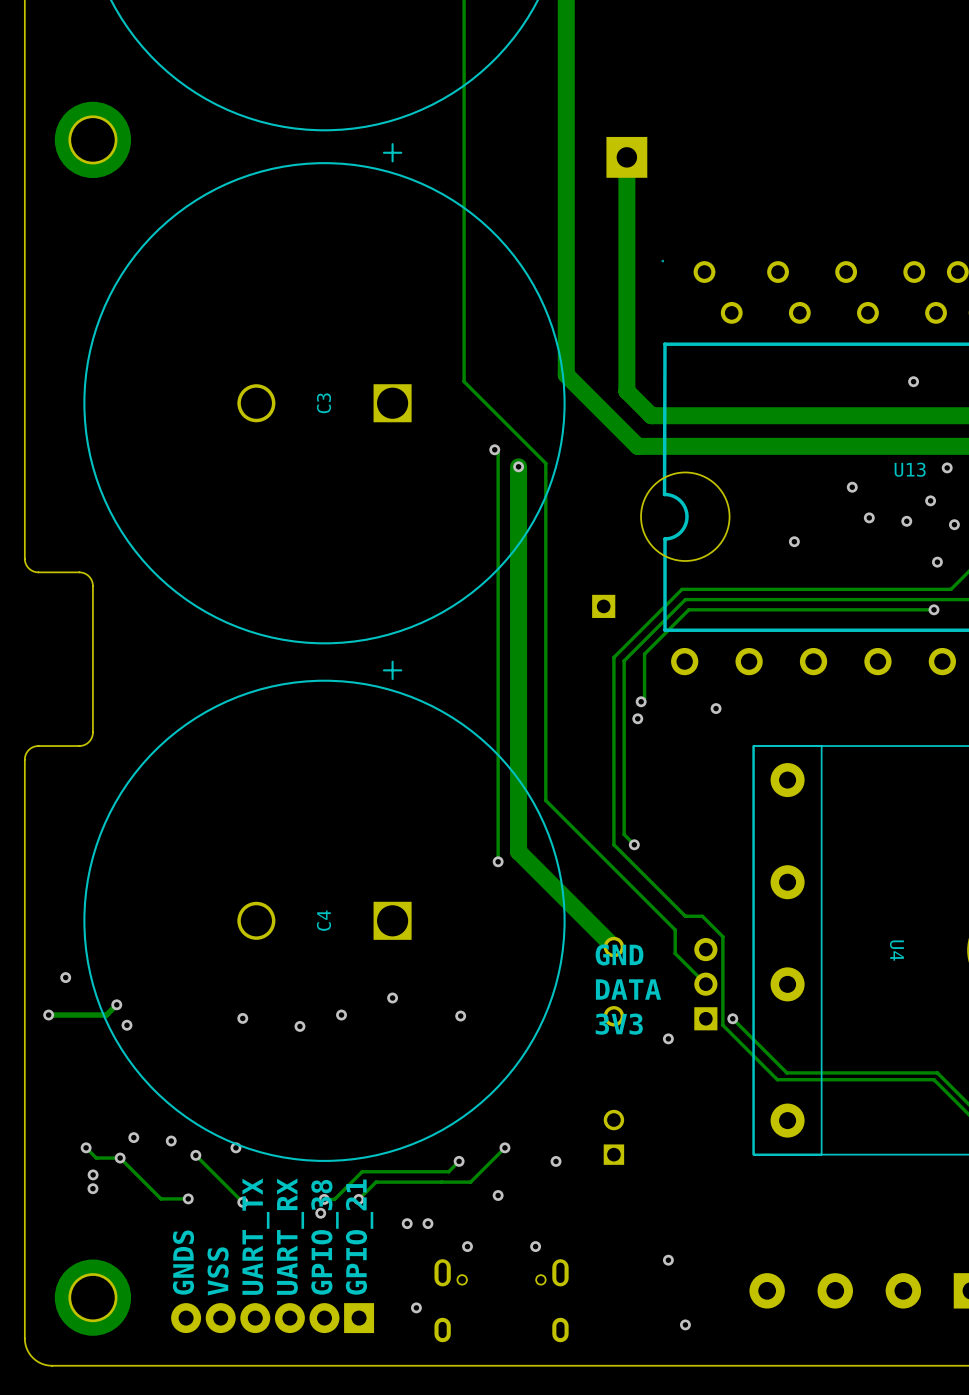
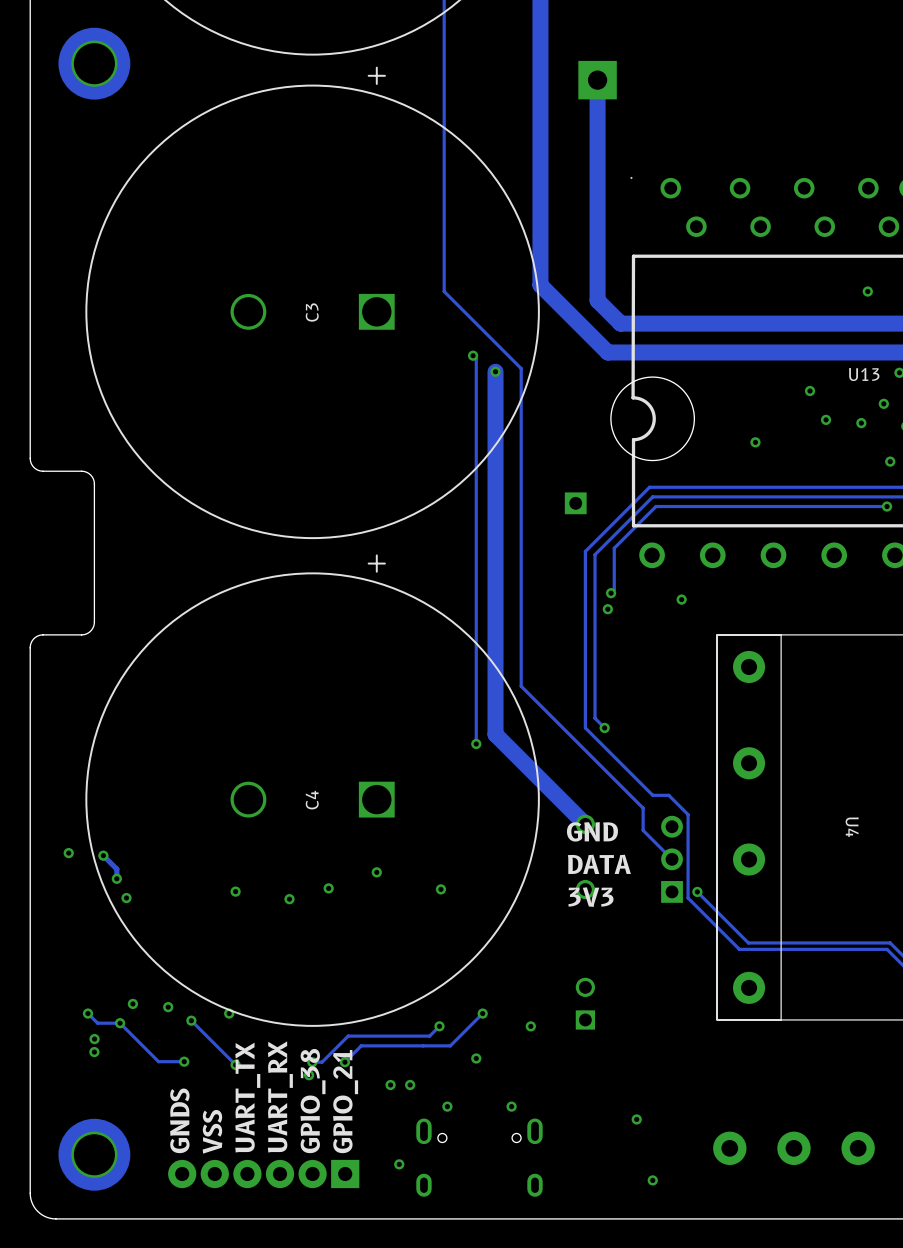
track: (116, 1004) (106, 1015) (48, 1015) -> (116, 878) (116, 869) (103, 855)
via position: (48, 1015) -> (103, 855)
via: (668, 1038) -> none

